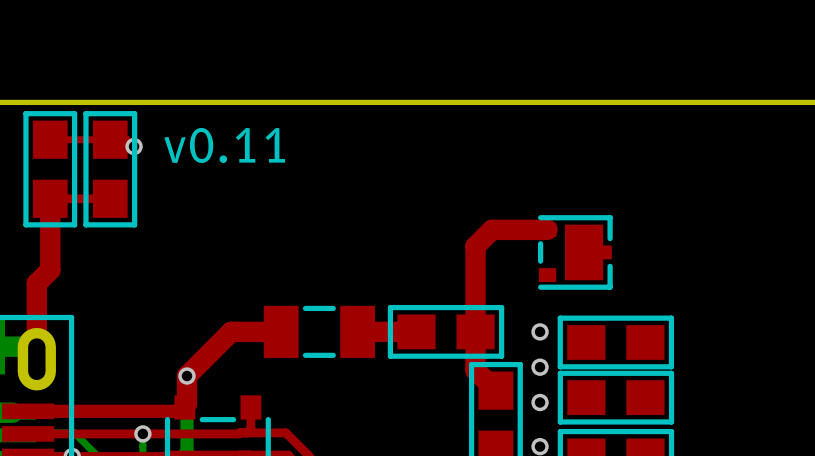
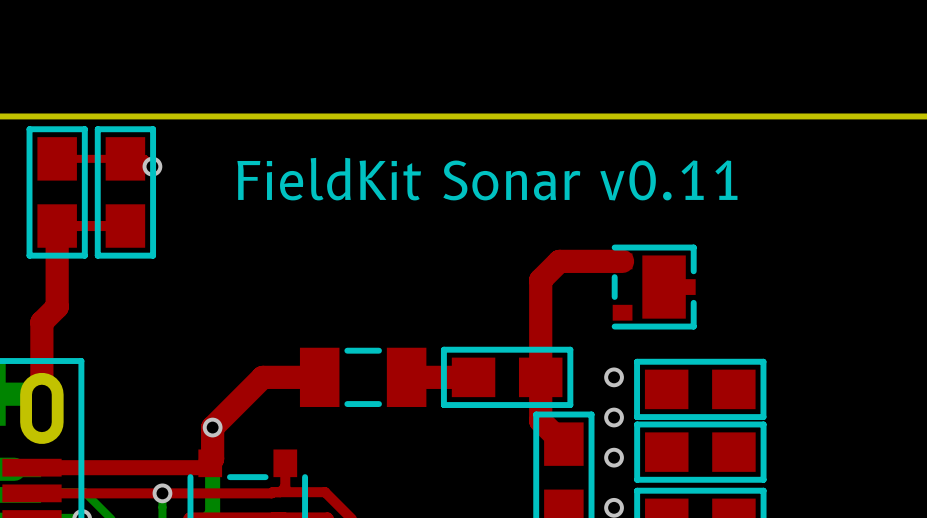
text: v0.11 (224, 145) -> none
text: none -> FieldKit Sonar v0.11 (487, 179)

